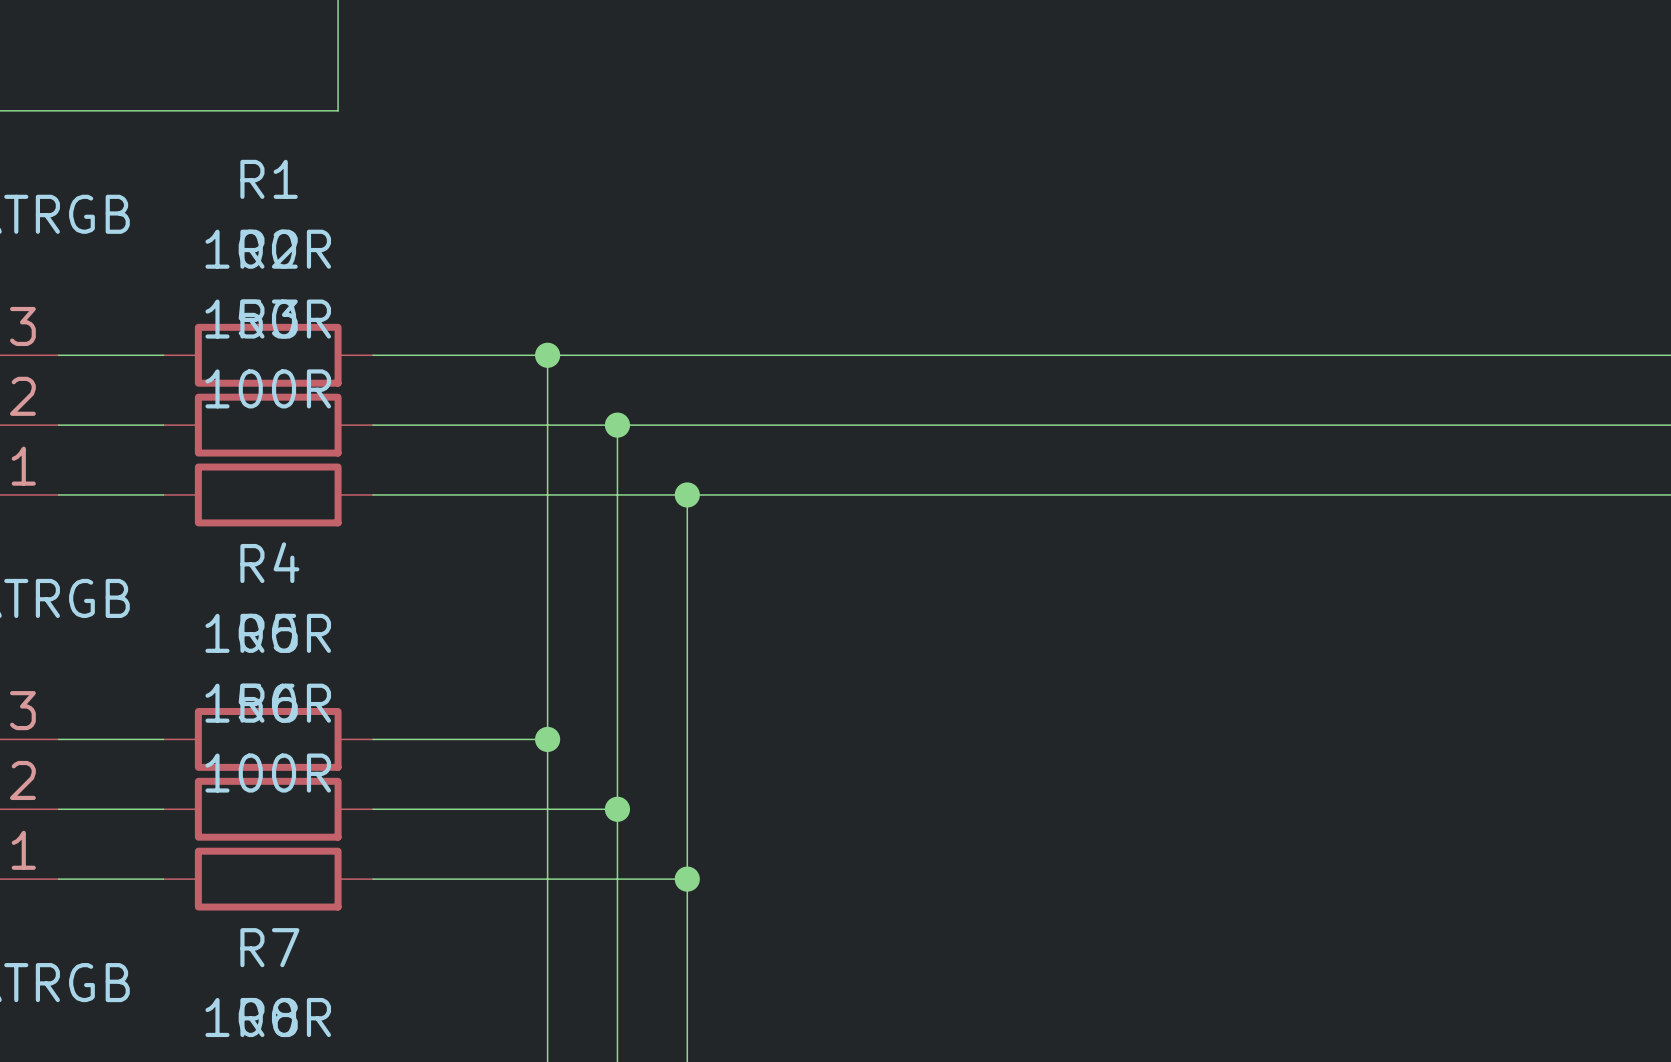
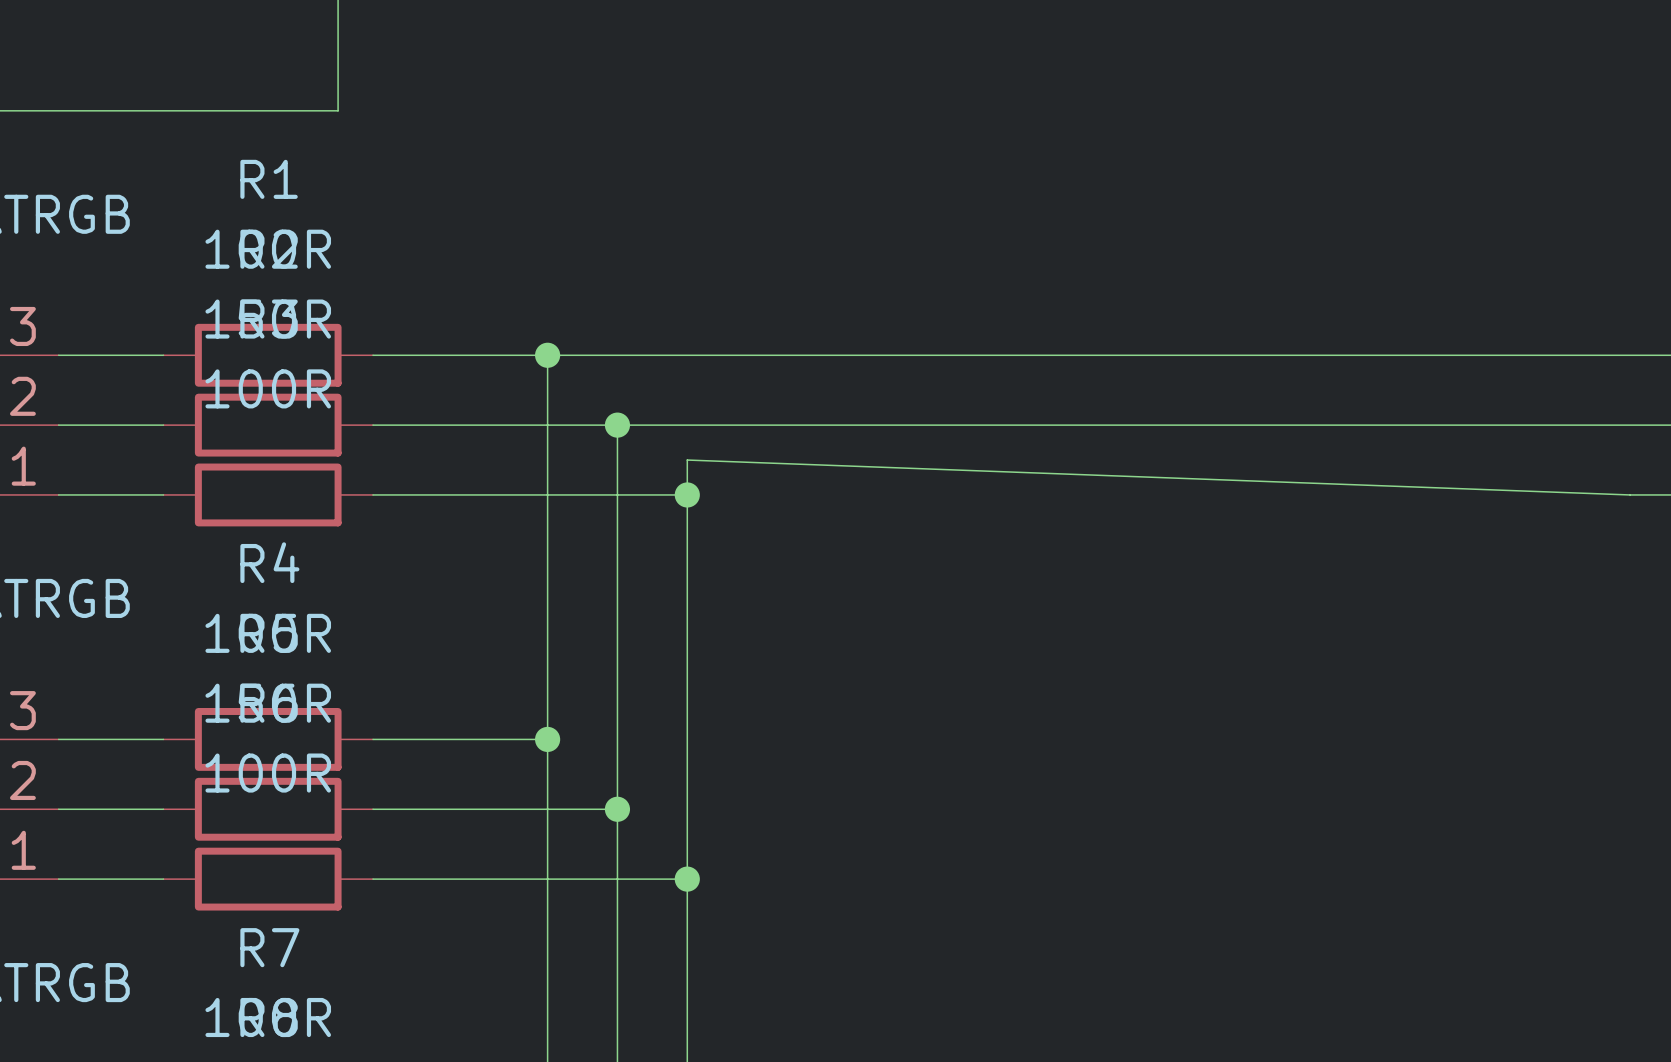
wire: (687, 494) (1630, 494) -> (687, 494) (687, 460) (1630, 494)

